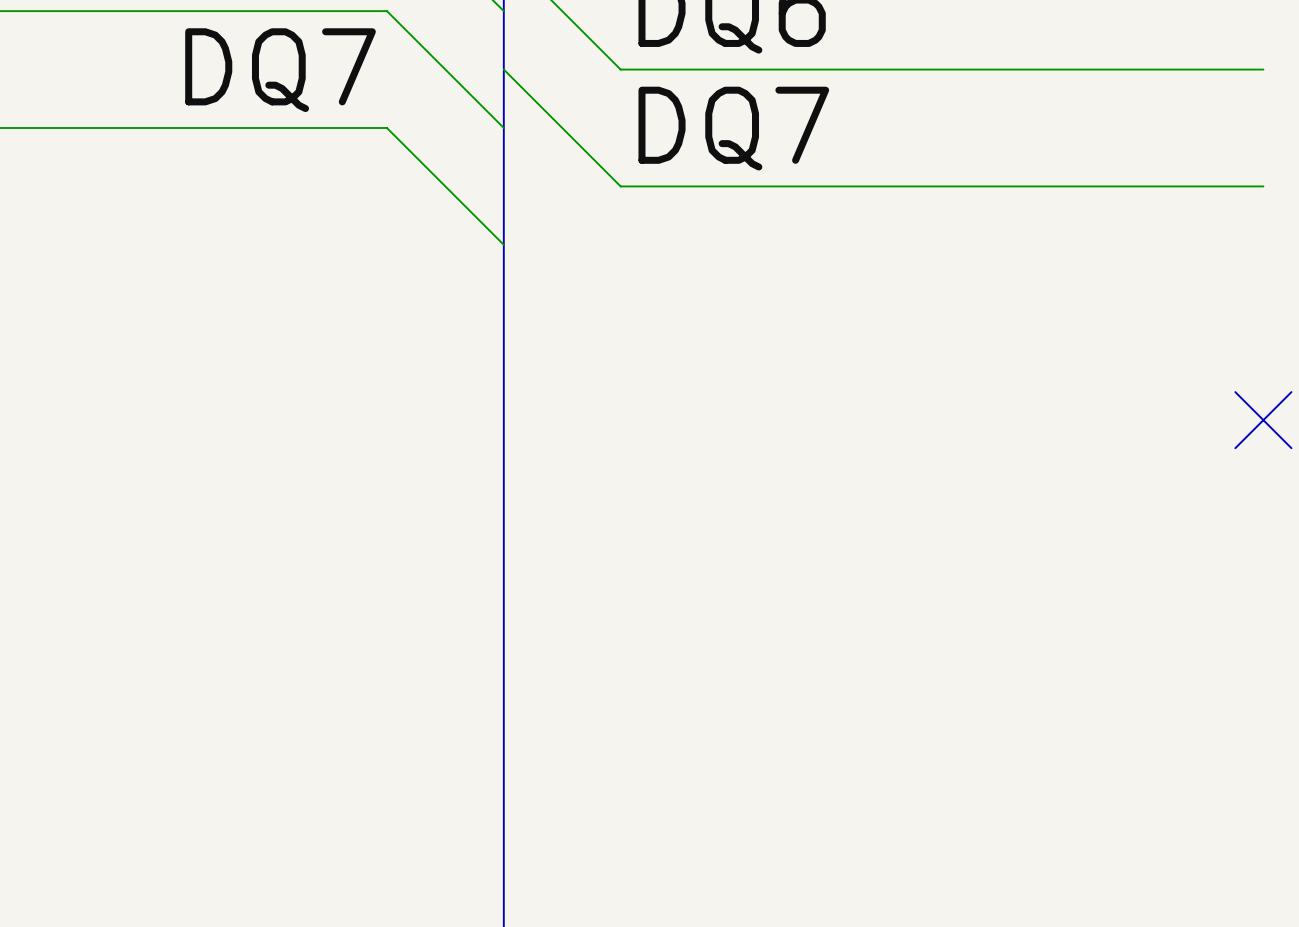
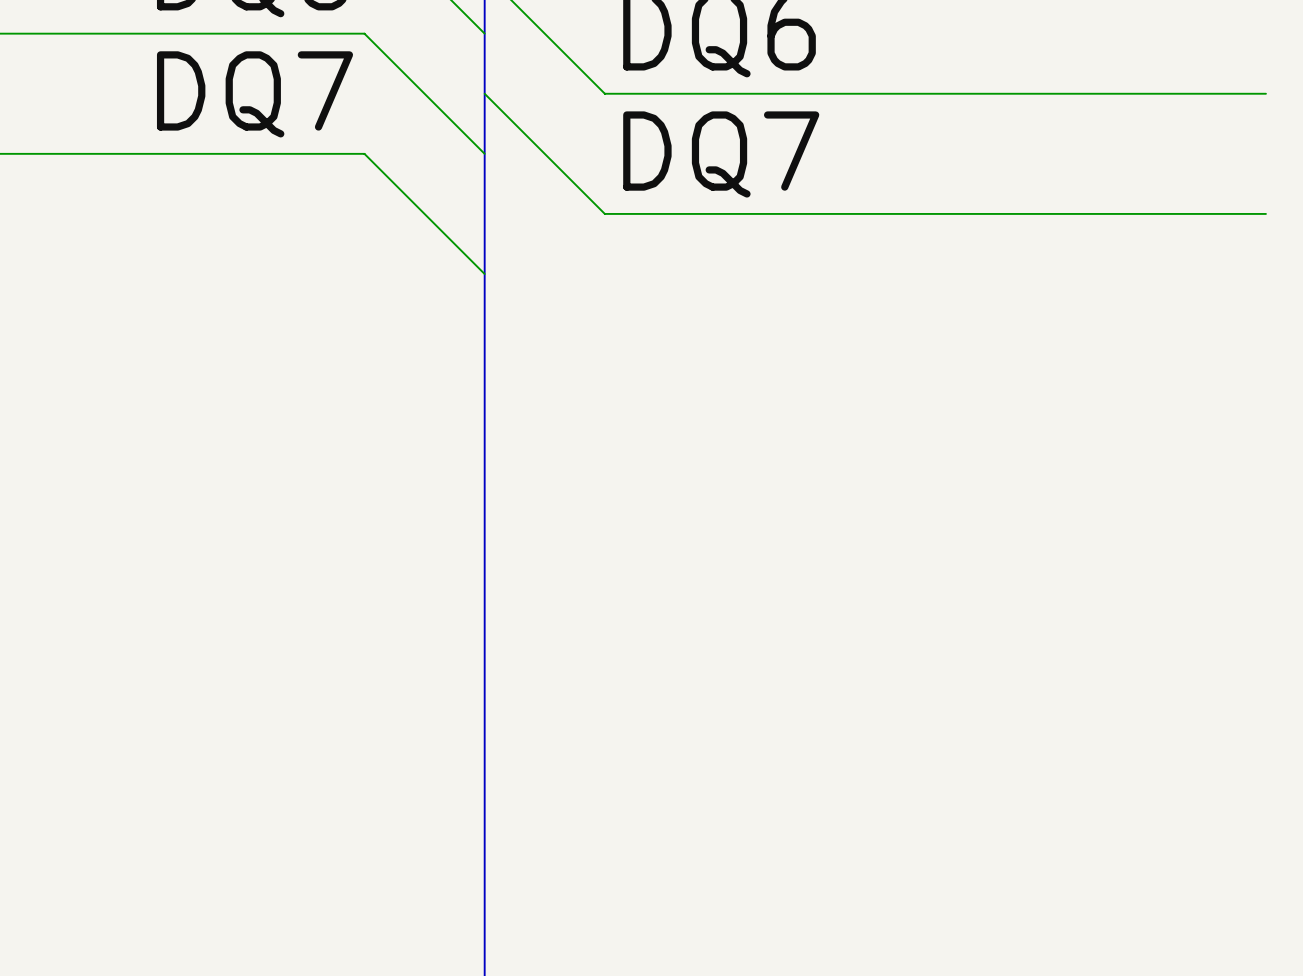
no-connect mark: (1263, 420) -> none

